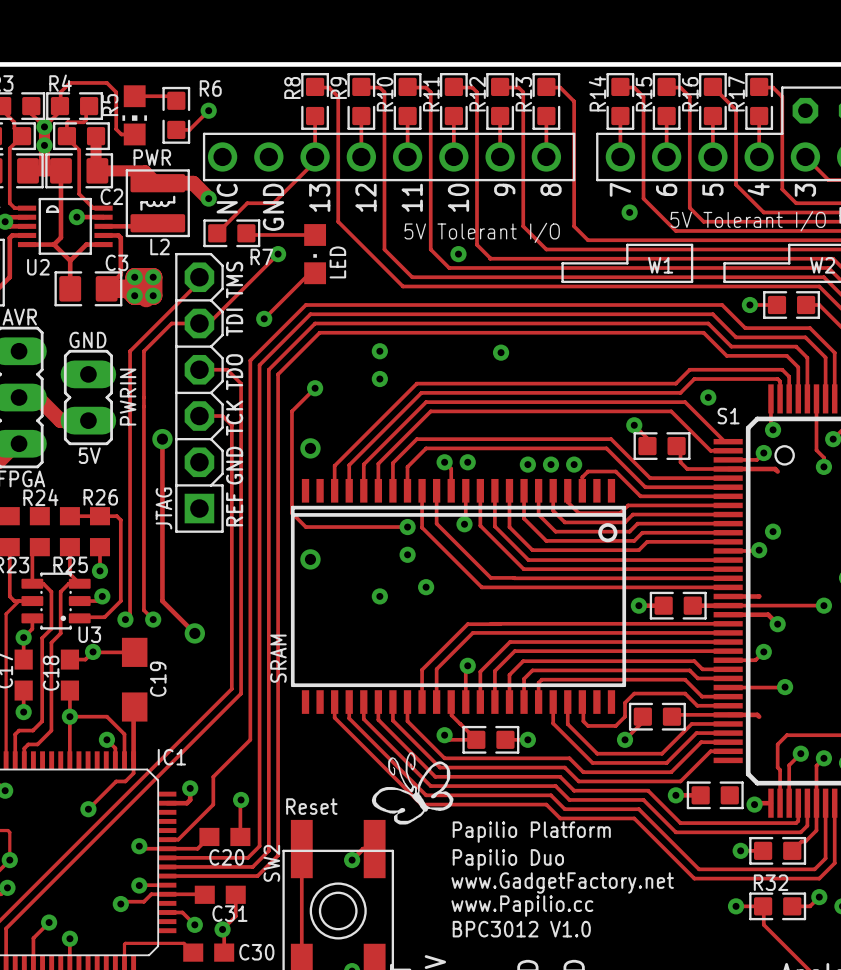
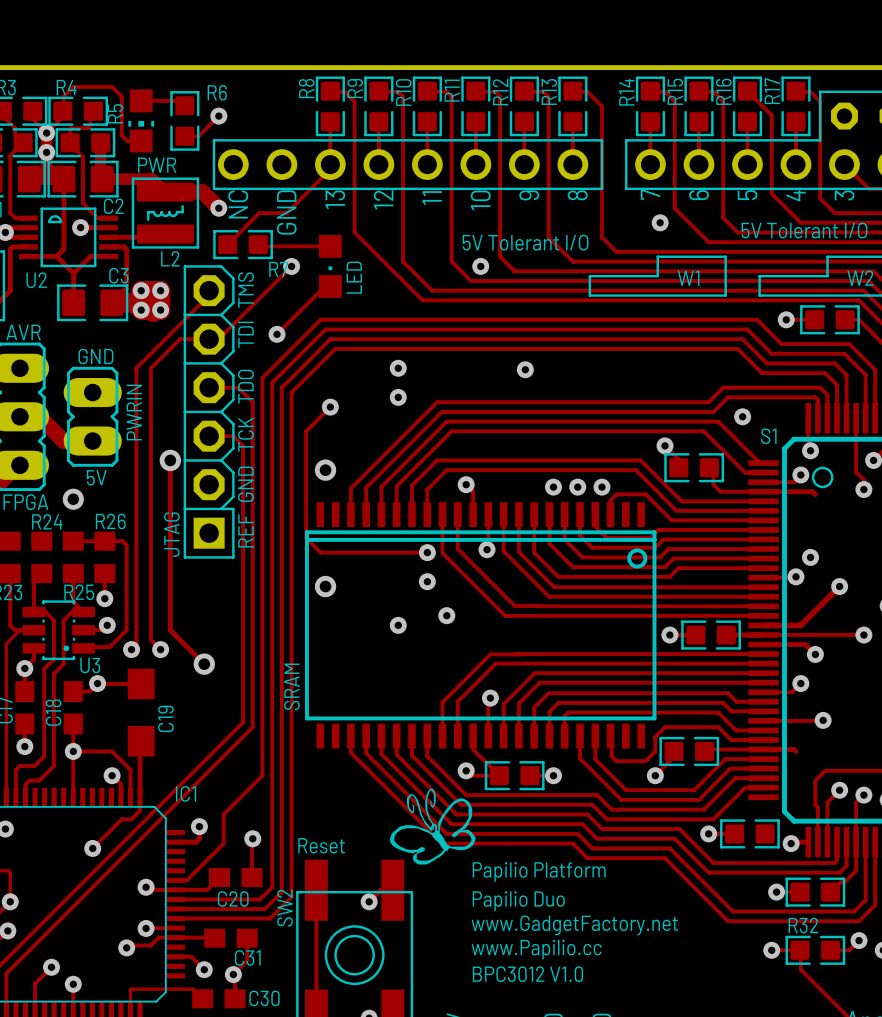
via: (467, 462) -> none
via: none -> (73, 499)
track: none -> (839, 586) (800, 625) (763, 625)
via: none -> (839, 586)

